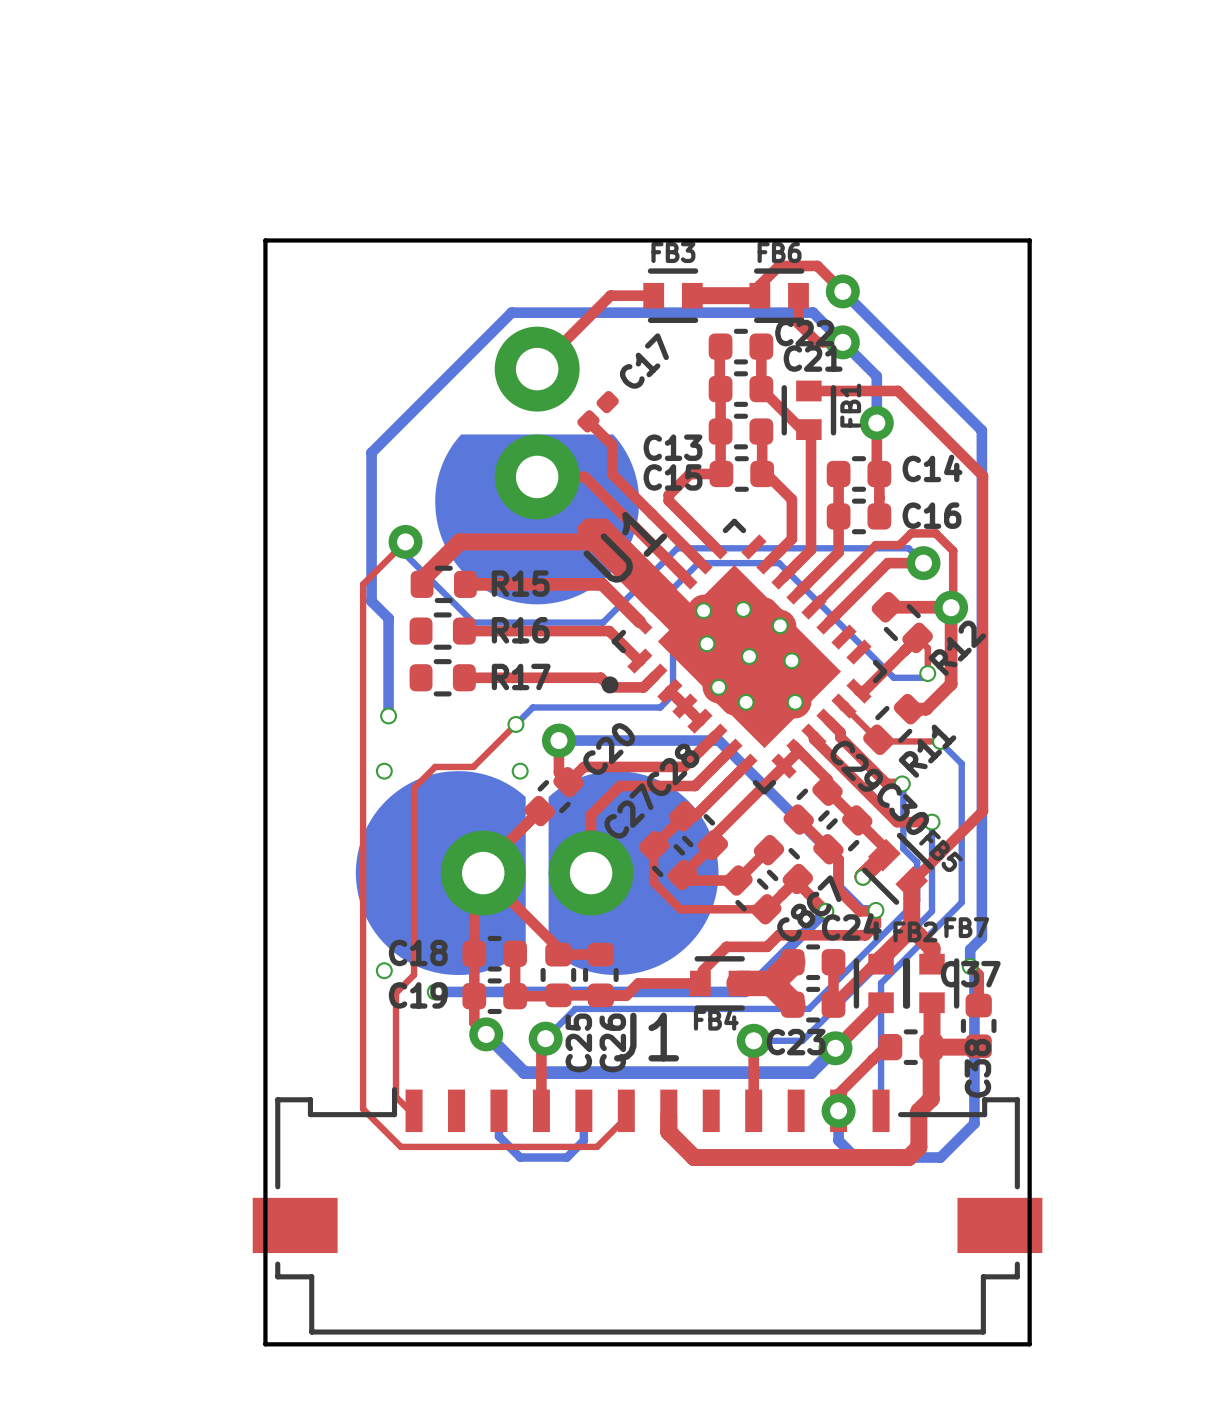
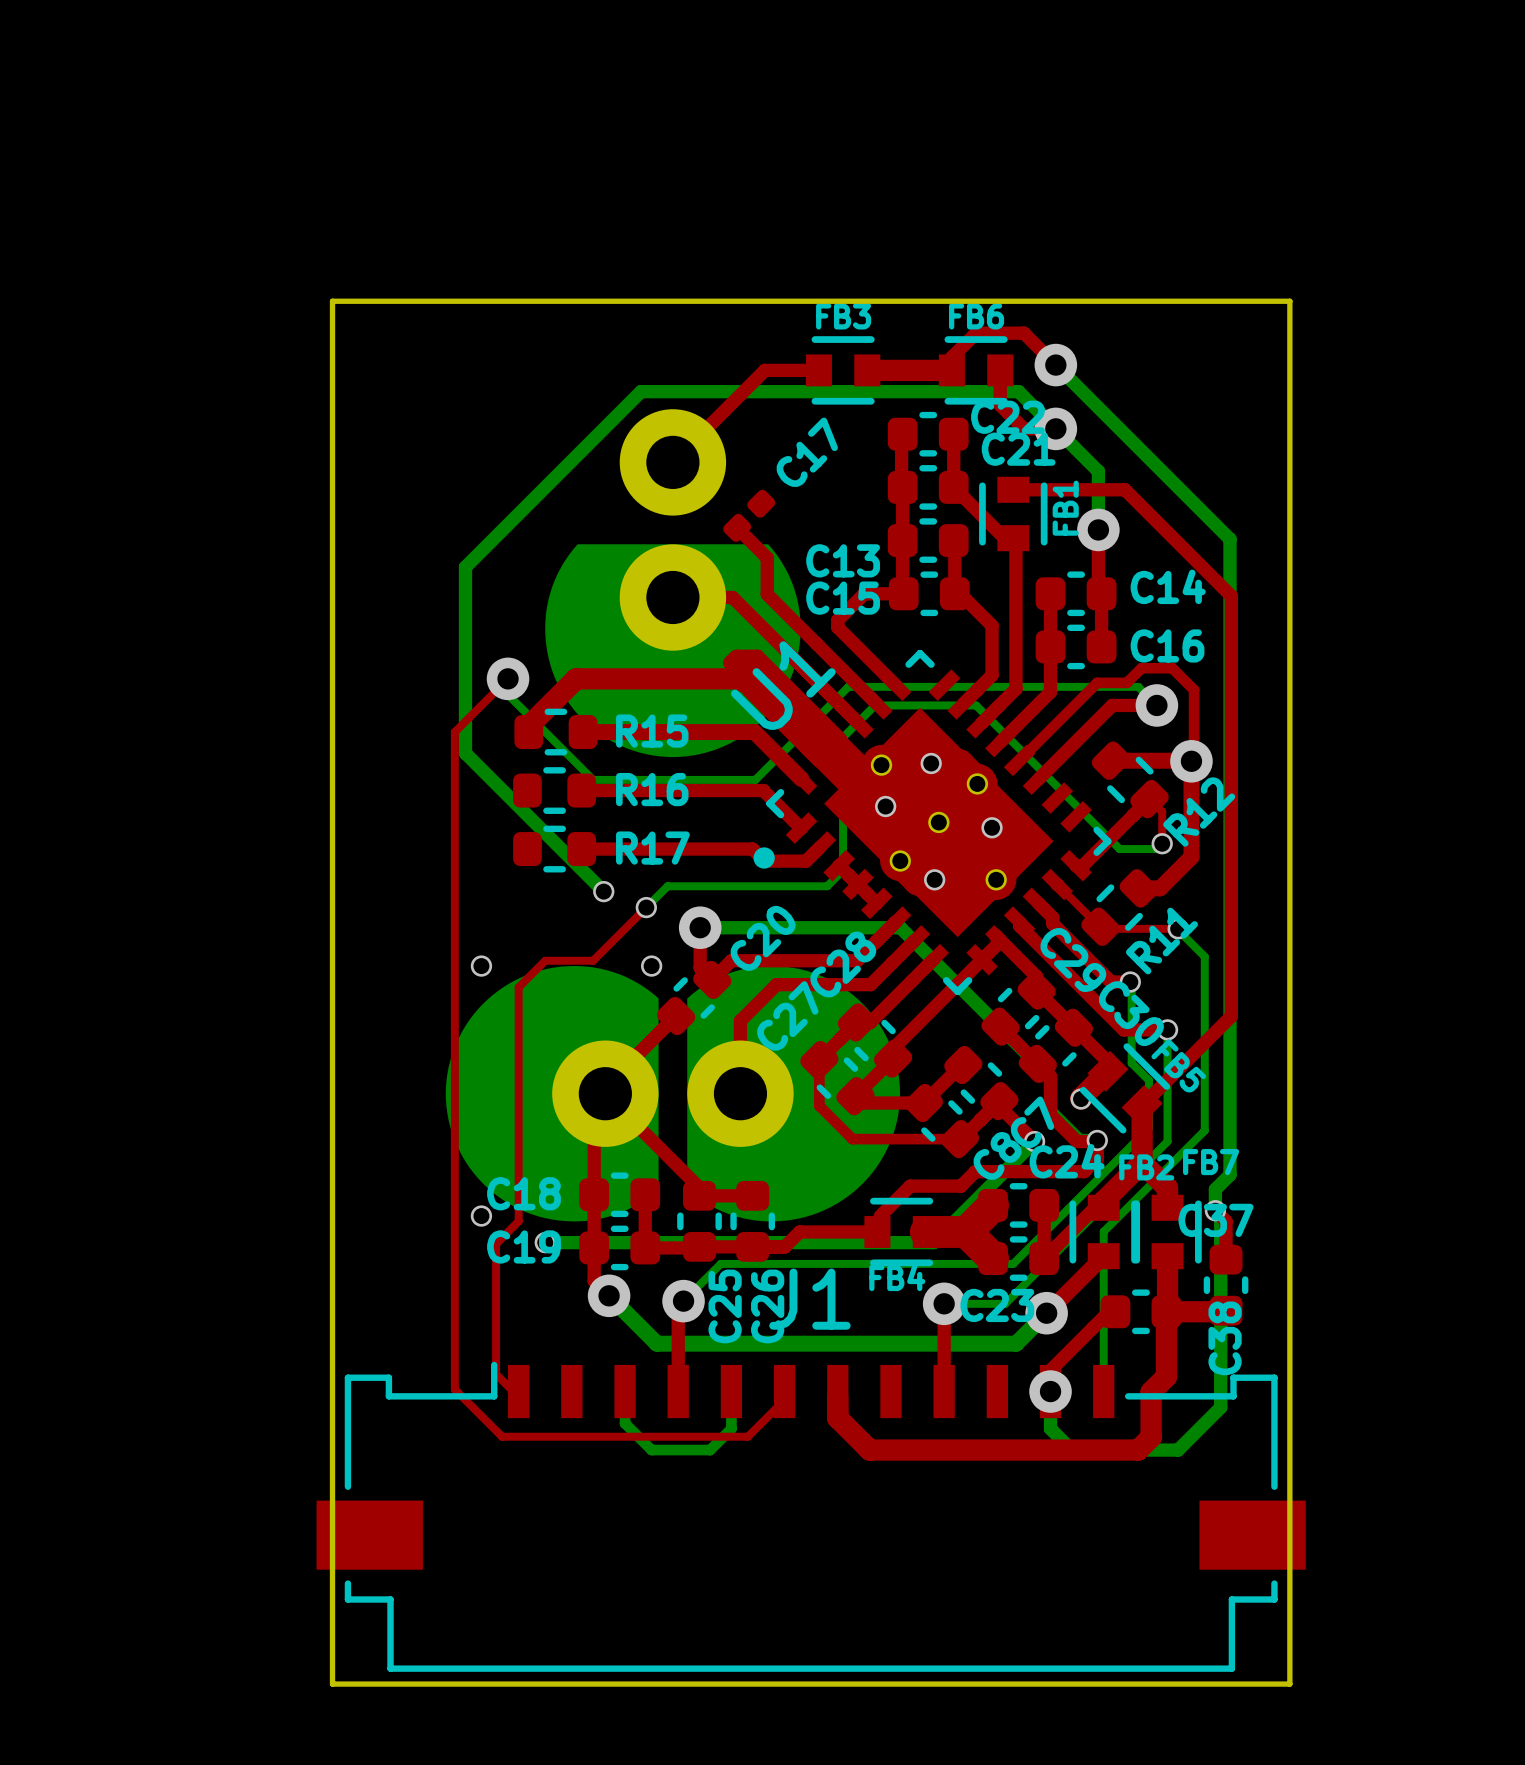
bottom track: (388, 618) (388, 715) -> (486, 774) (603, 891)
via position: (388, 715) -> (603, 891)

